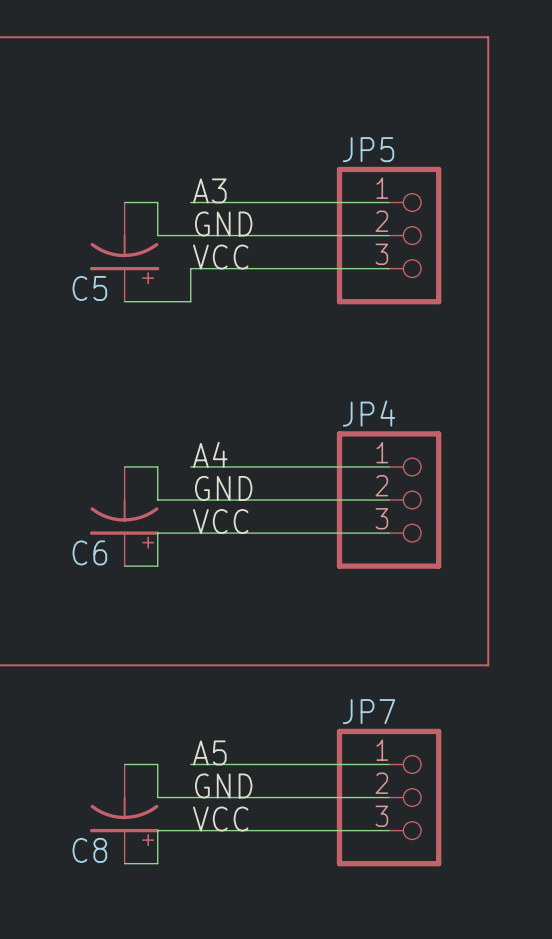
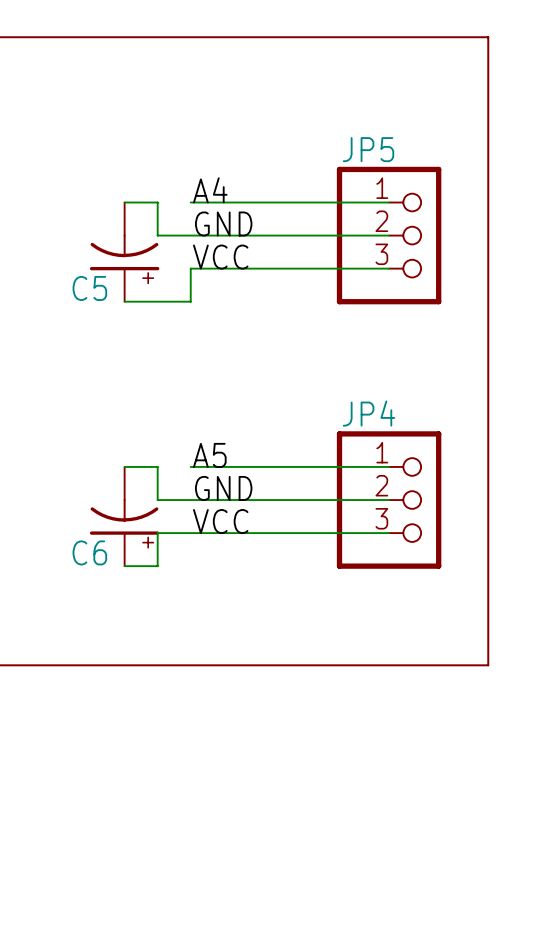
label: A3 (209, 190) -> A4 (210, 190)
label: A4 (210, 454) -> A5 (209, 455)
label: A5 (209, 752) -> none
wire: (124, 764) (157, 764) (157, 797) (389, 797) -> none
wire: (190, 764) (389, 764) -> none
label: GND (223, 785) -> none
JP7: (389, 797) -> none
C8: (124, 814) -> none
label: VCC (220, 819) -> none
wire: (389, 830) (157, 830) (157, 863) (124, 863) -> none

